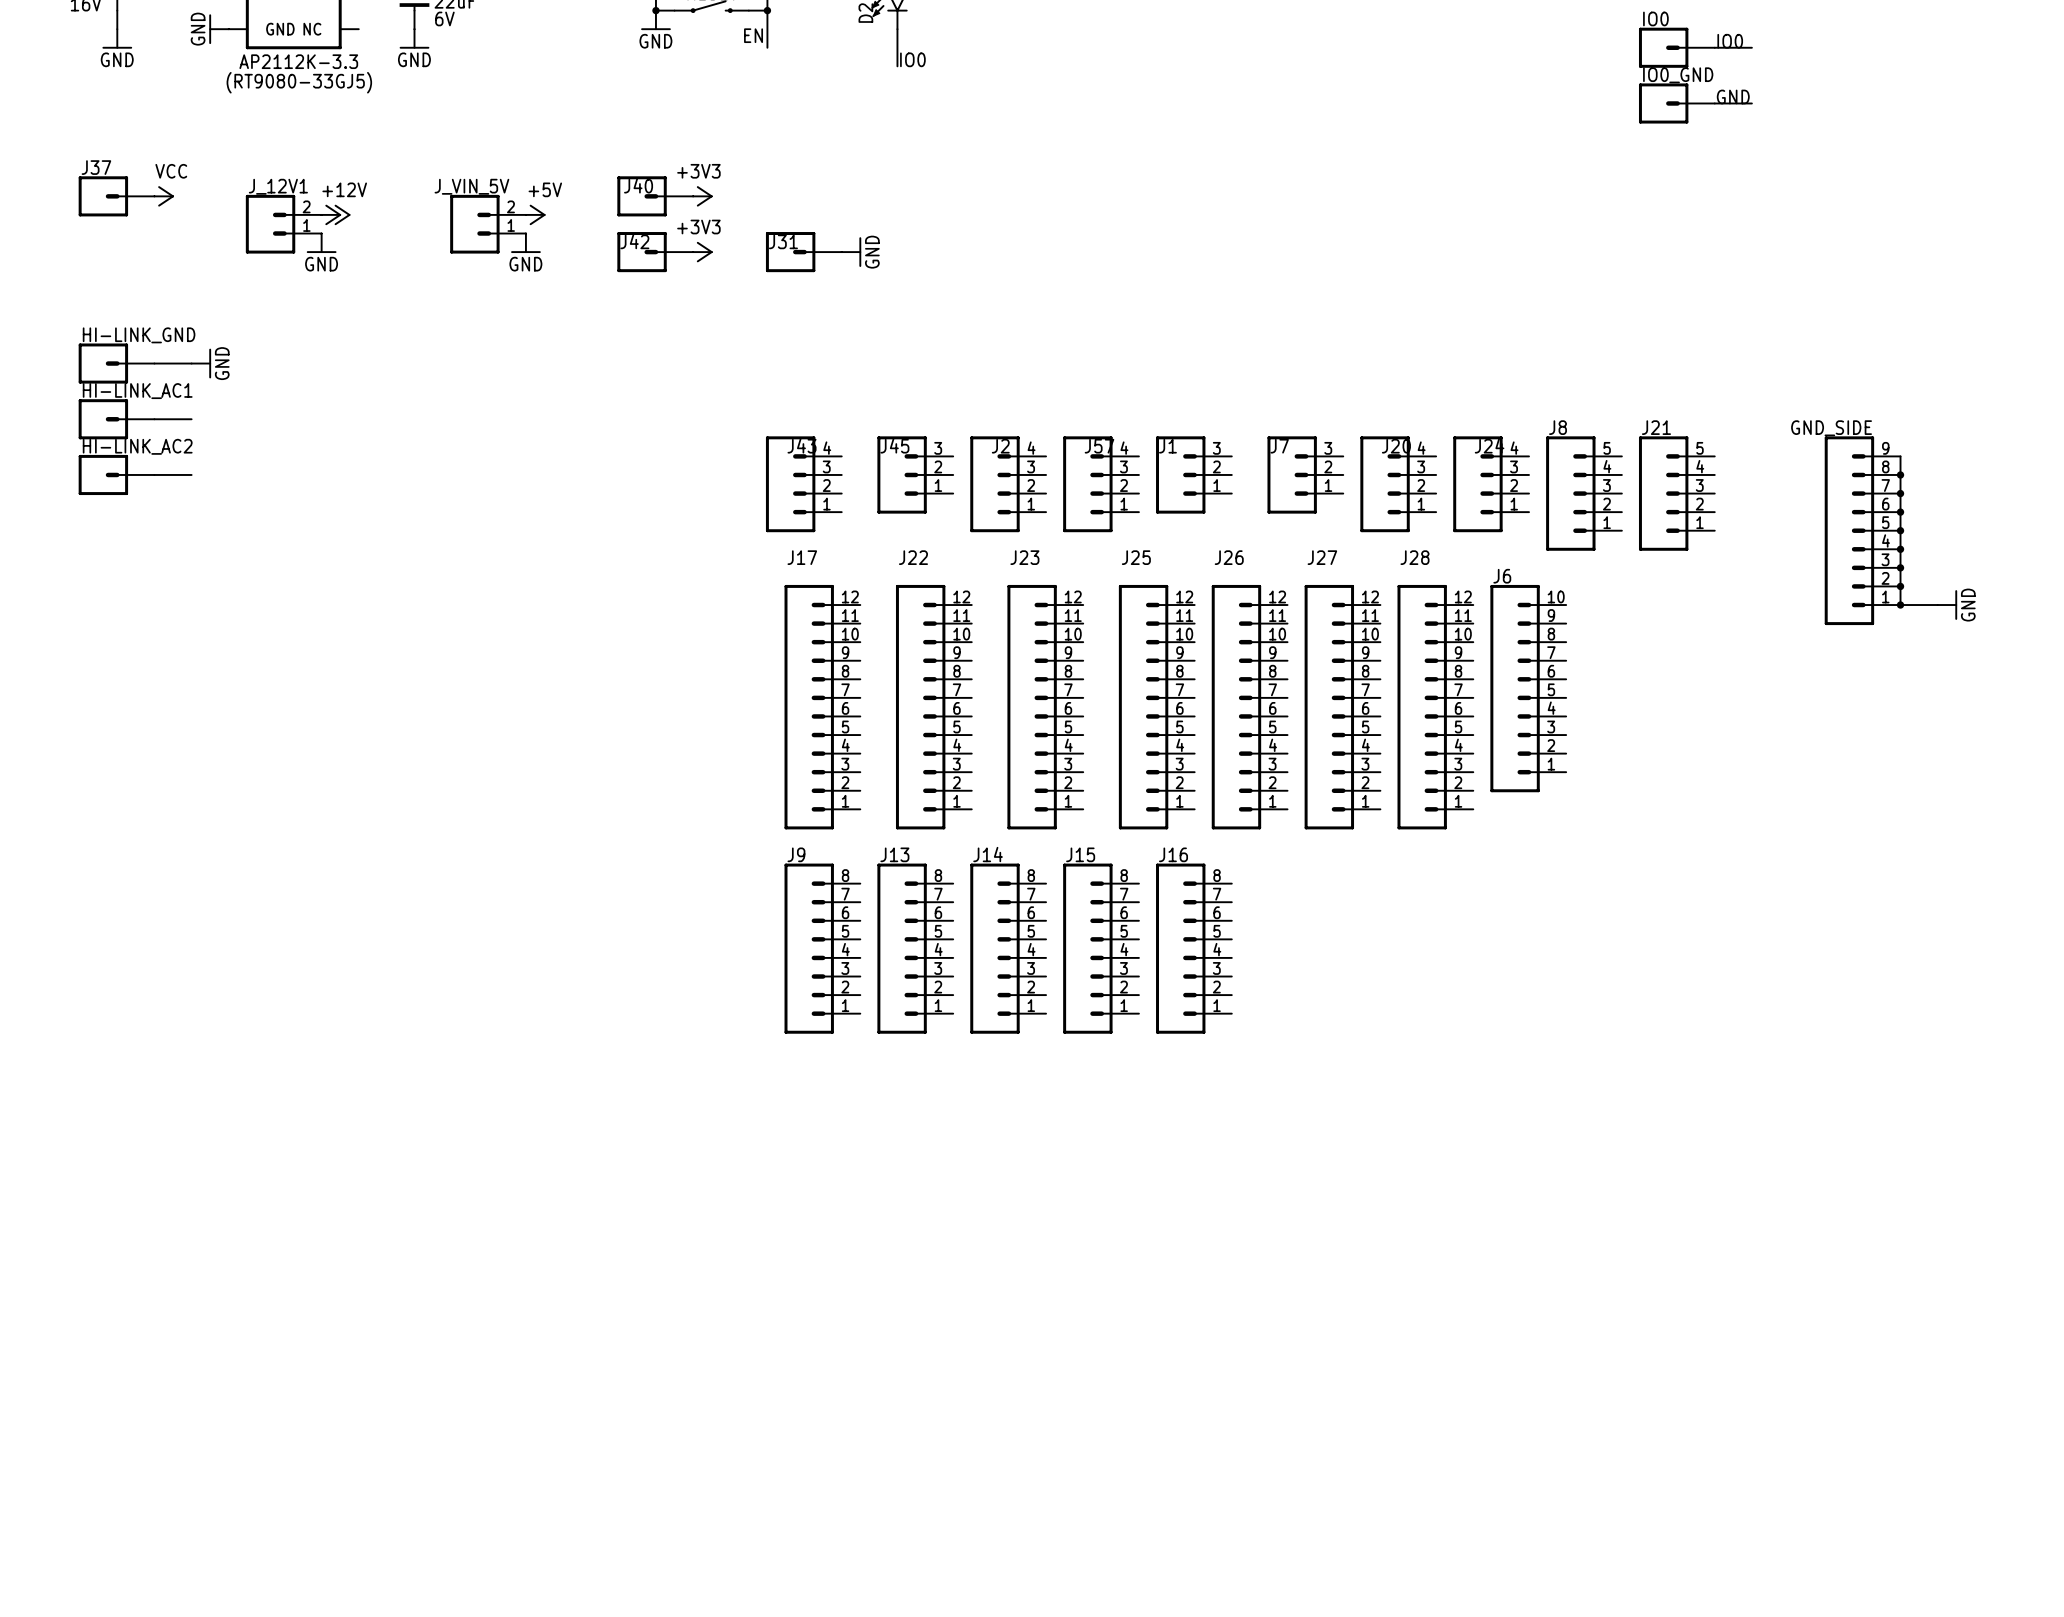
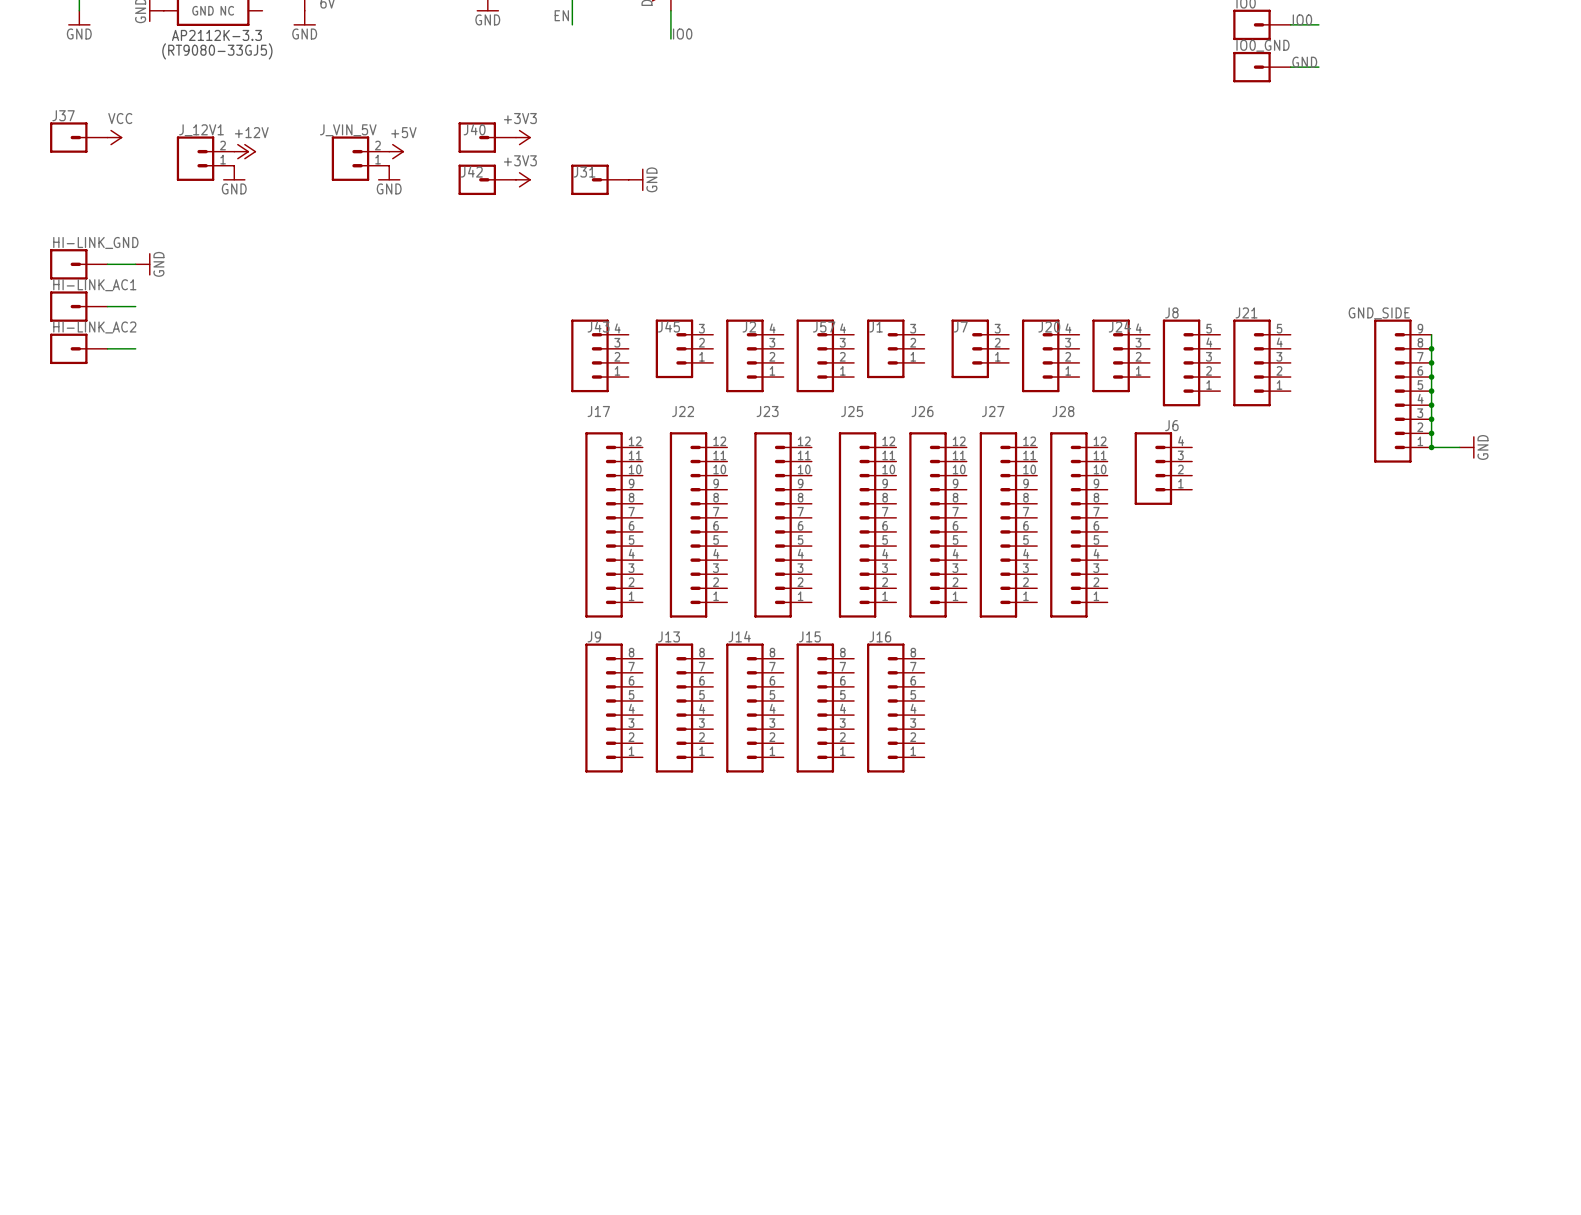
J6 name position: J6 (1502, 576) -> J6 (1171, 425)
J6 symbol: [1490, 584, 1567, 793] -> [1134, 432, 1193, 505]

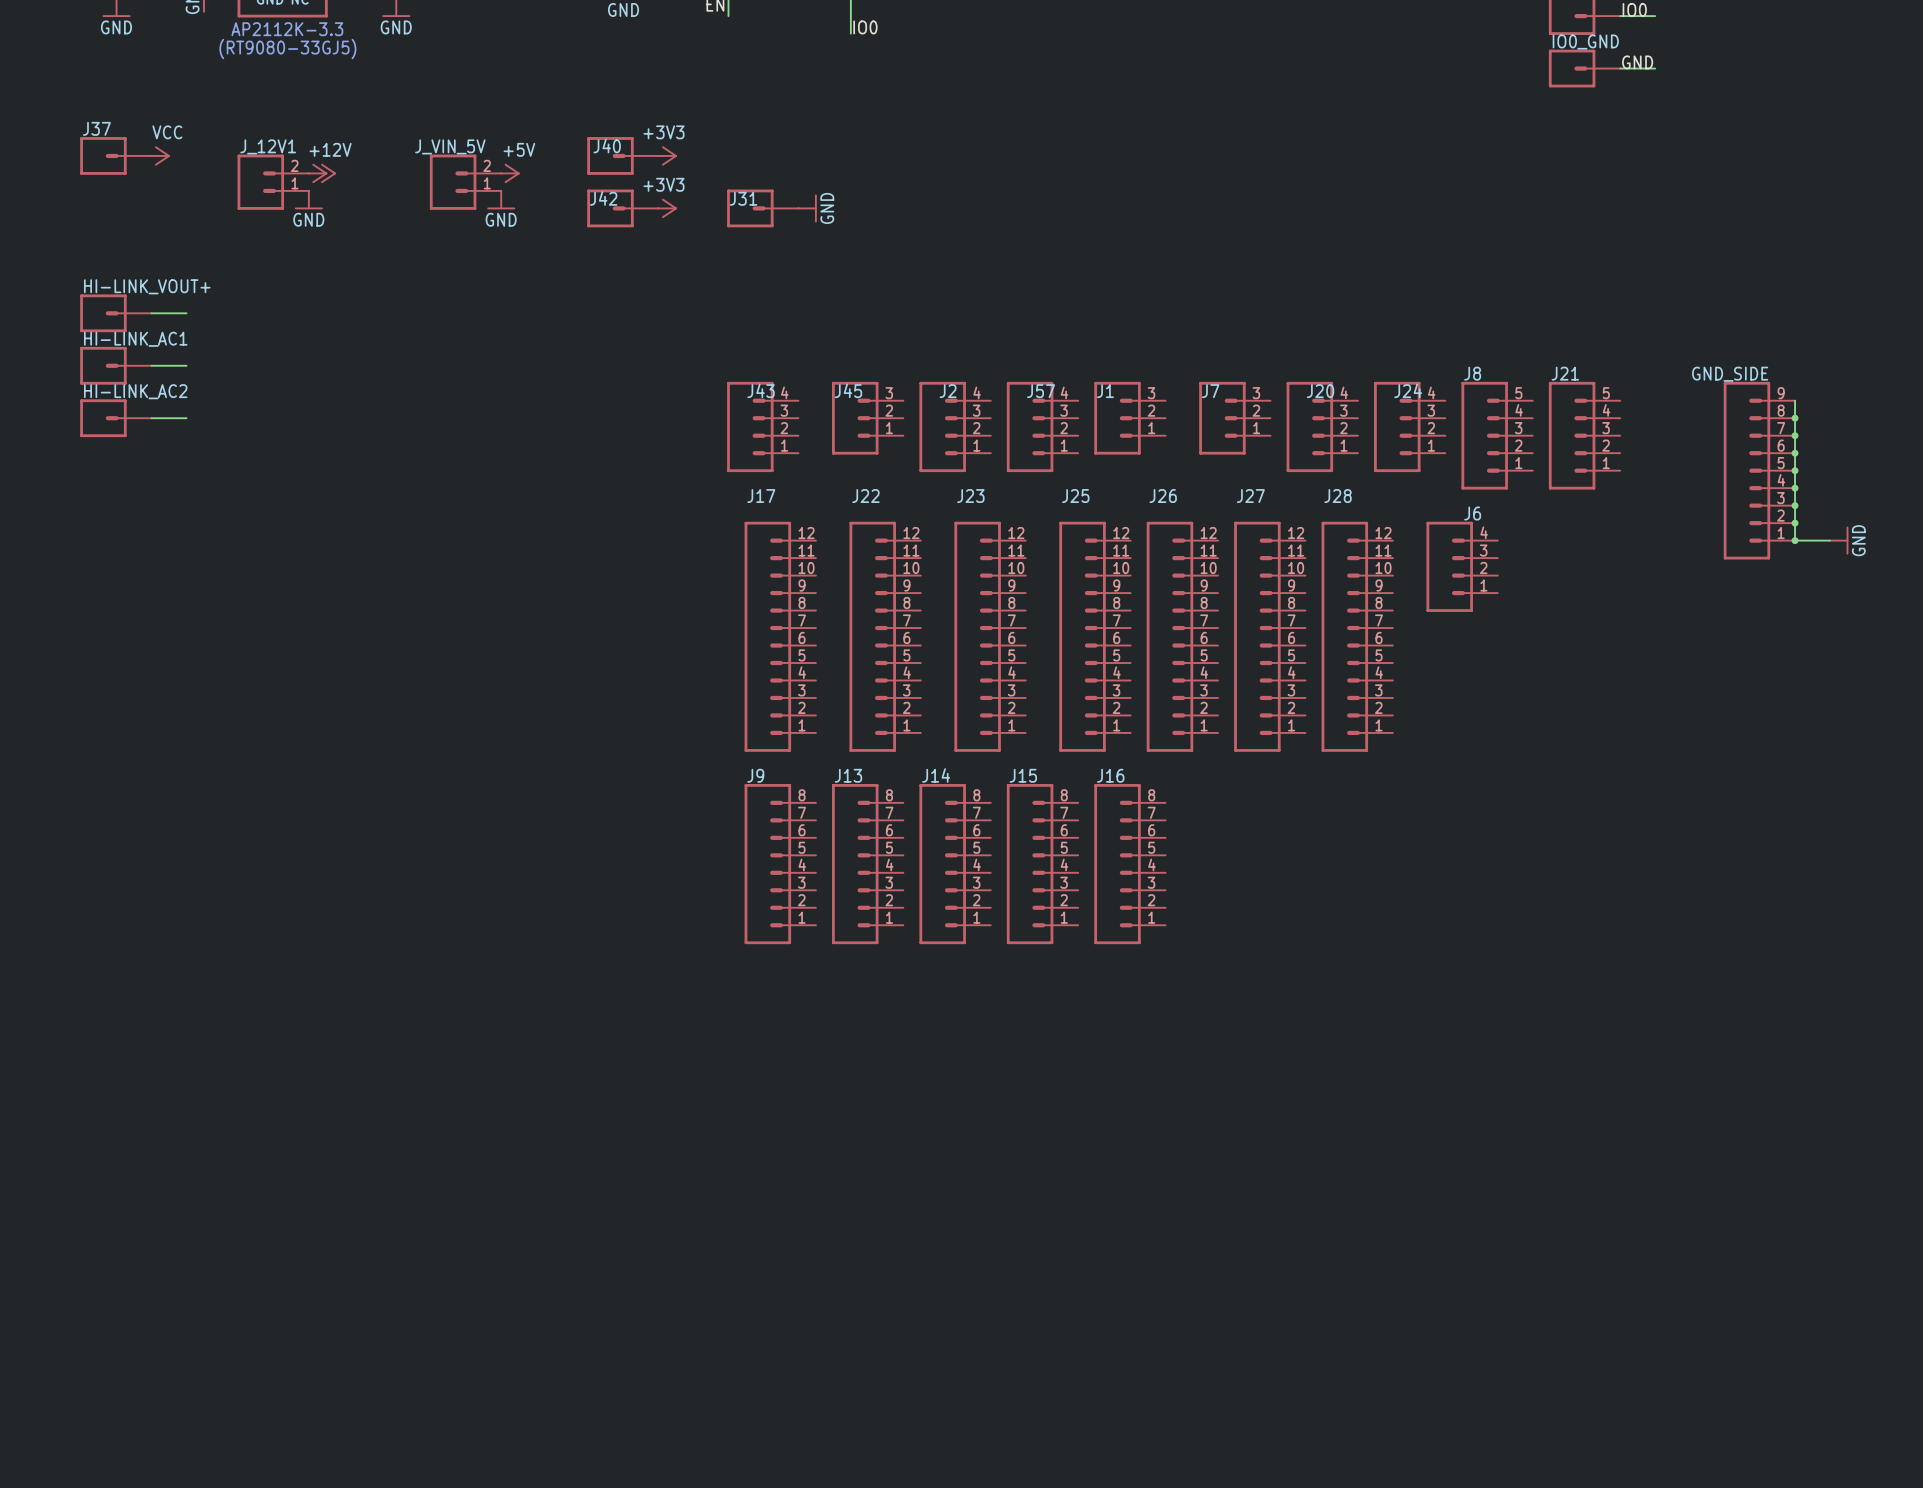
HI-LINK_GND name: HI-LINK_GND (95, 242) -> HI-LINK_VOUT+ (147, 286)
power symbol: GND (143, 264) -> none

